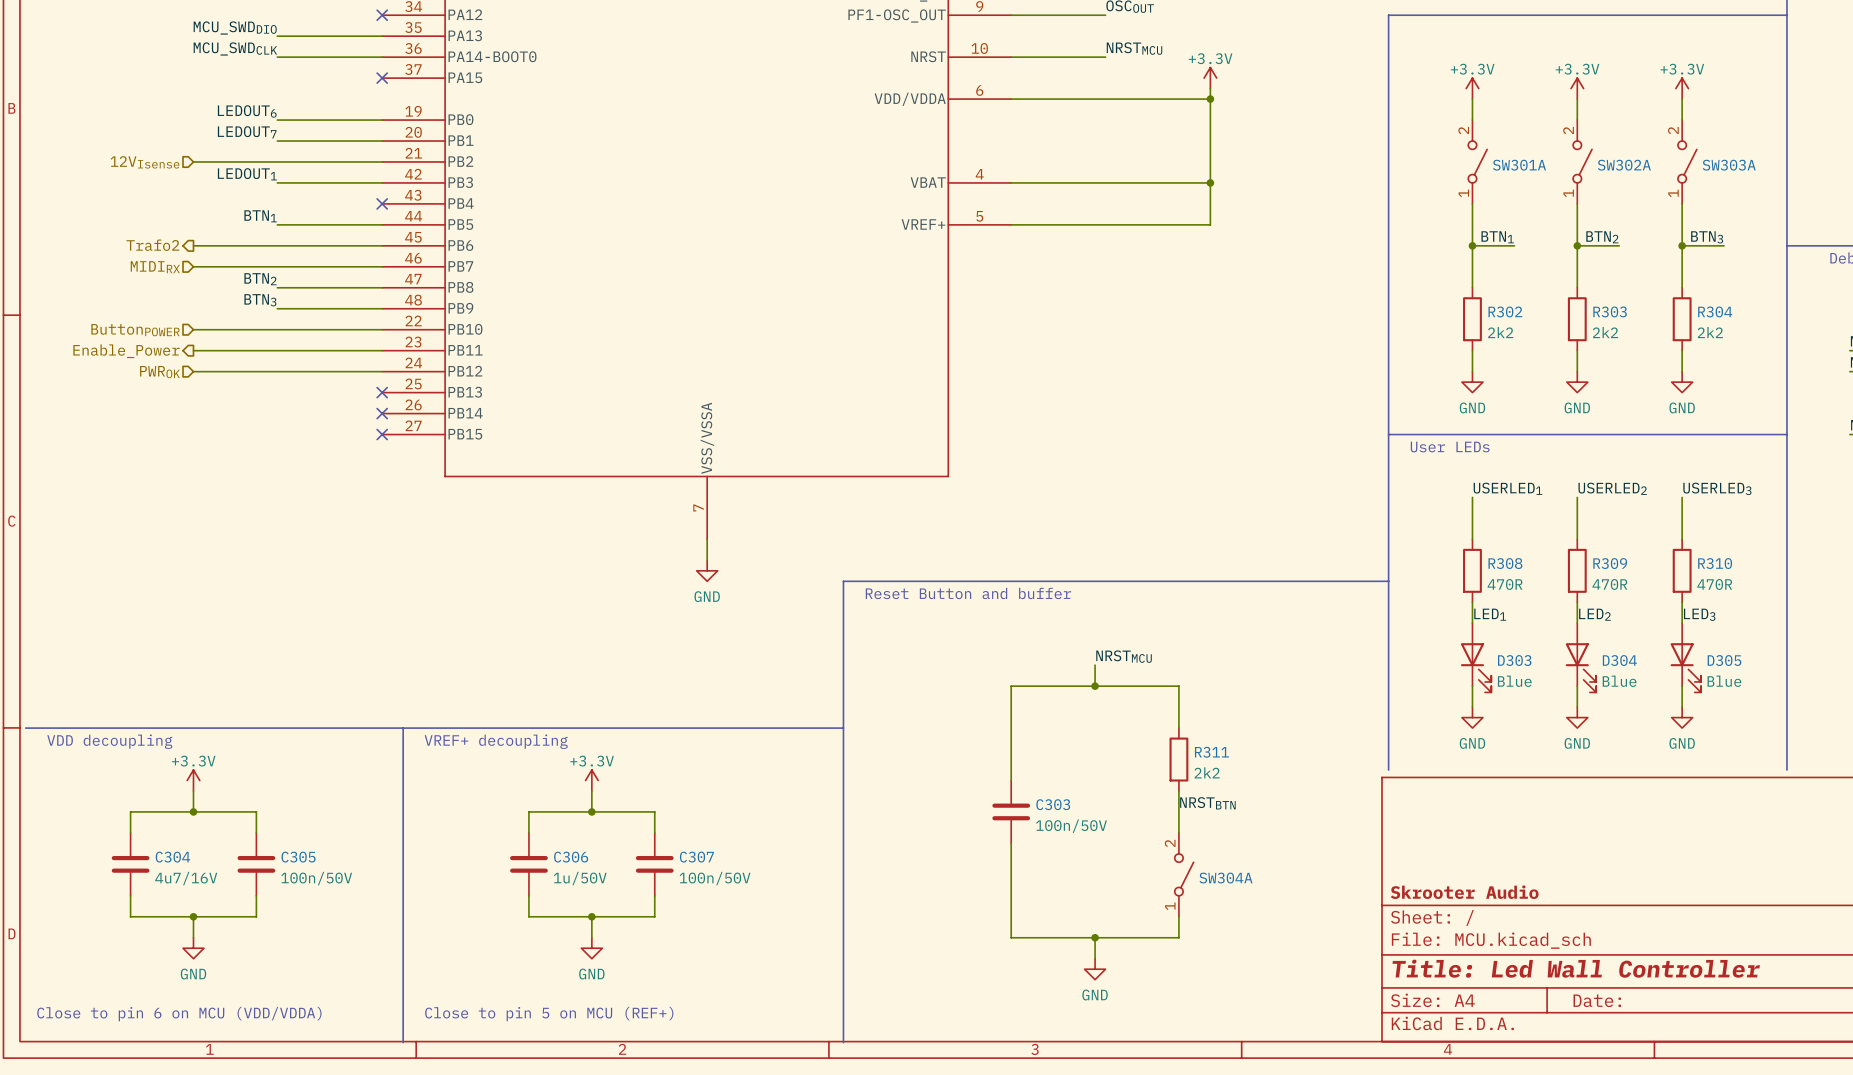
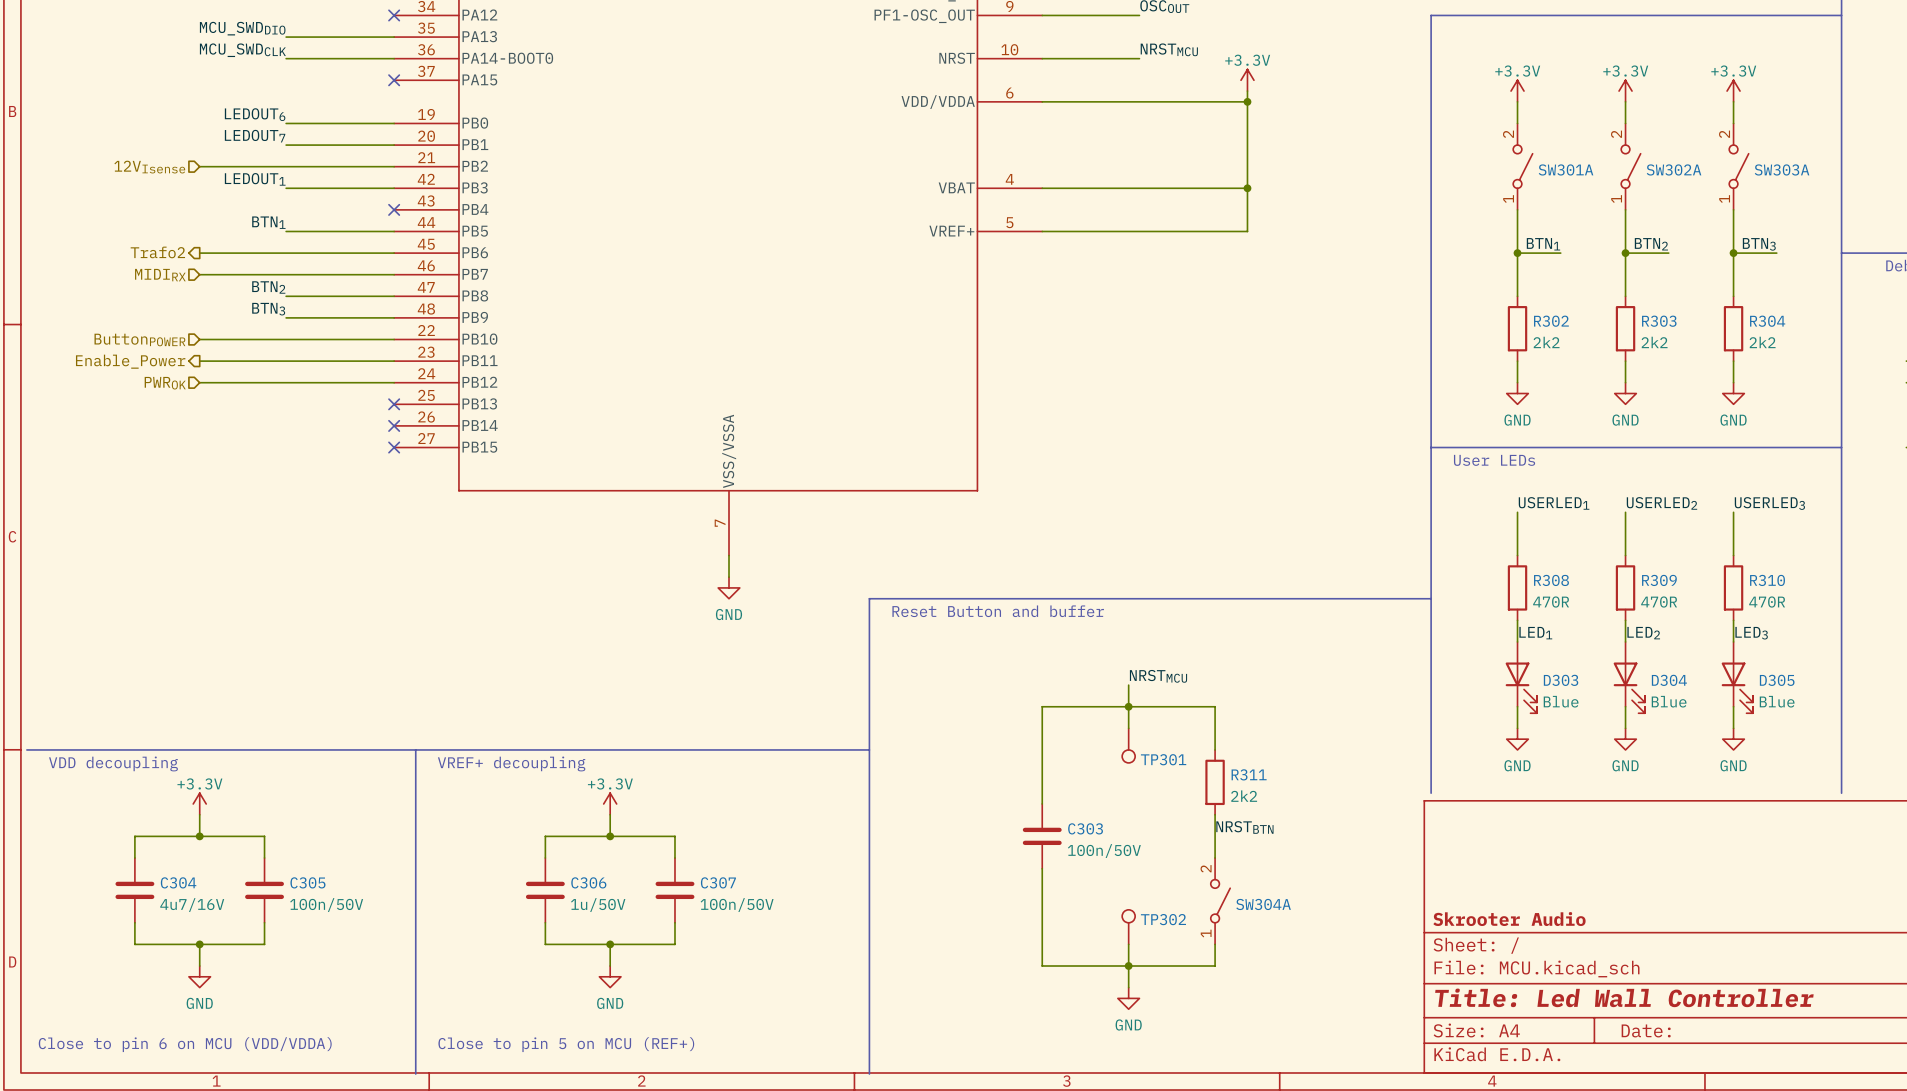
wire: none -> (1128, 706) (1128, 728)
TP301: none -> (1128, 745)
TP302: none -> (1128, 927)
wire: none -> (1128, 944) (1128, 966)

